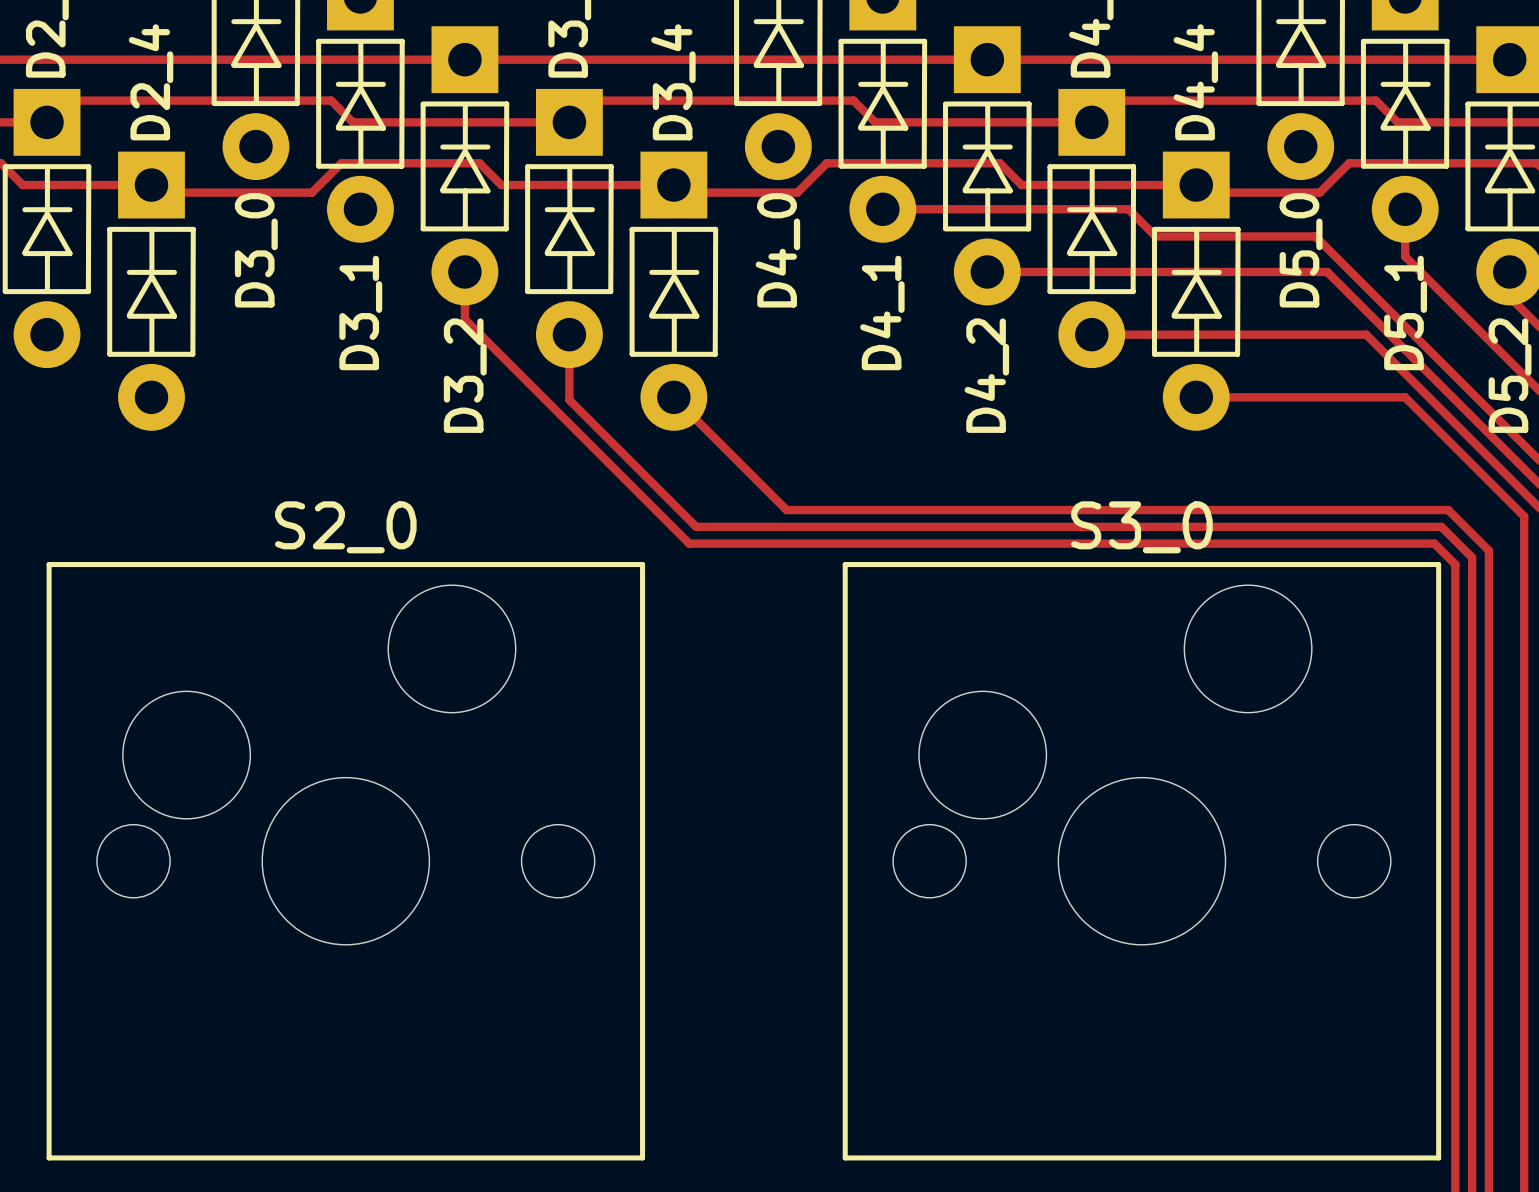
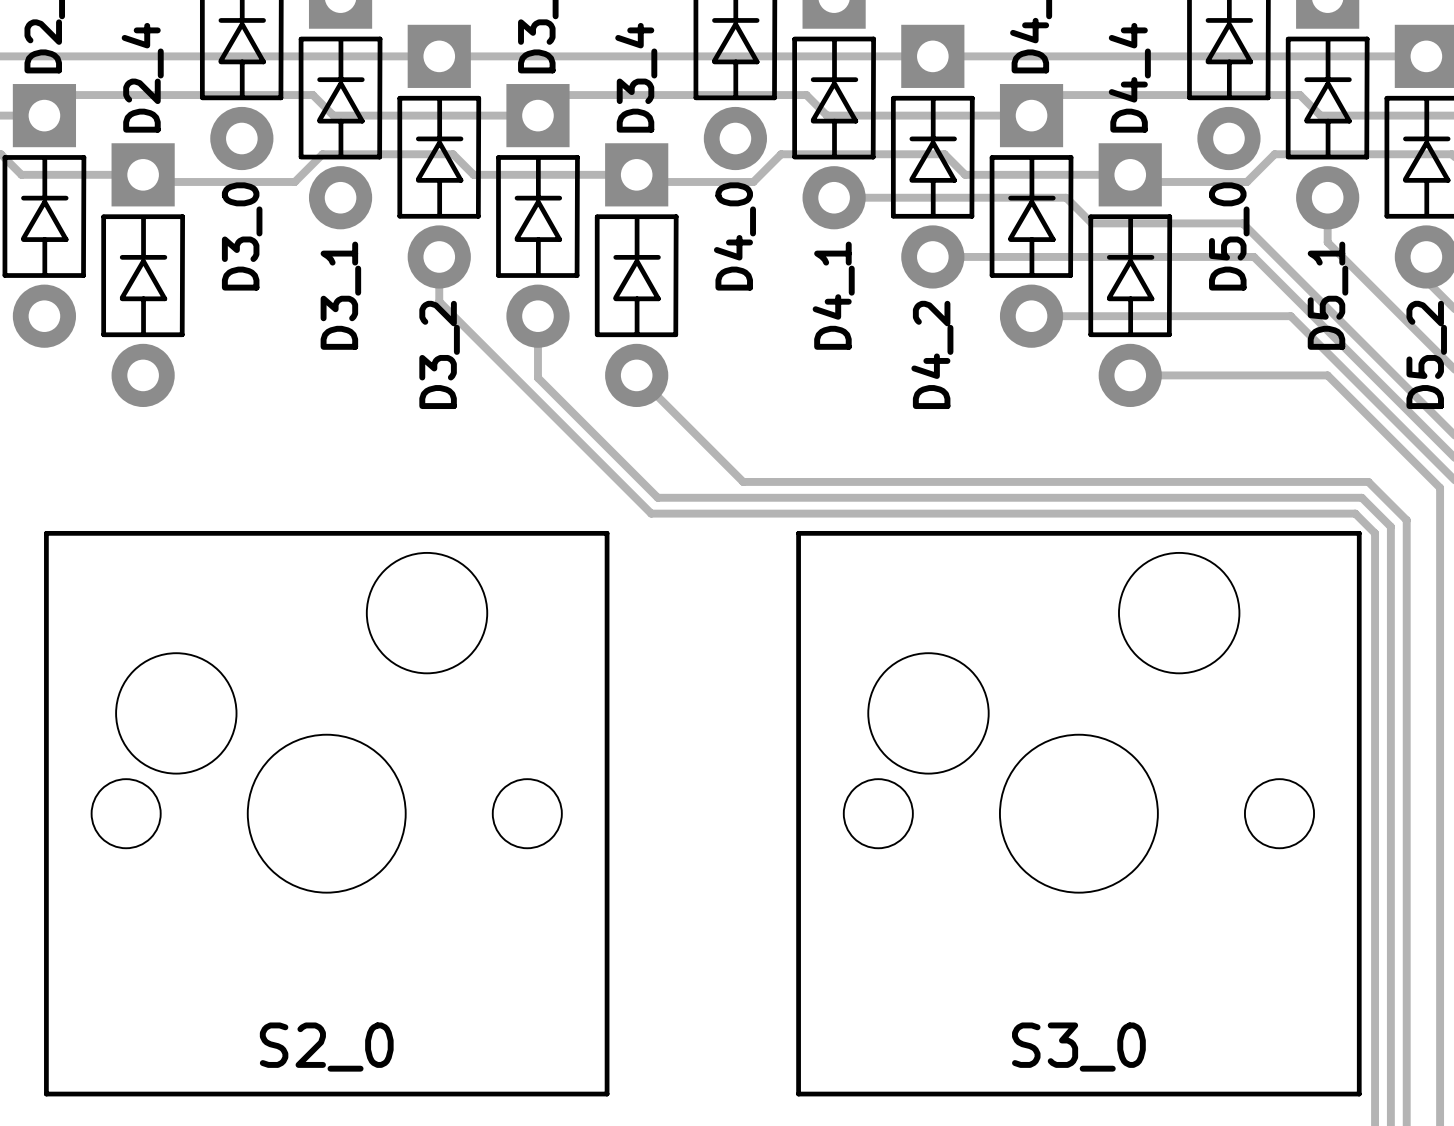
S2_0 name position: S2_0 (345, 527) -> S2_0 (326, 1047)
S3_0 name position: S3_0 (1141, 527) -> S3_0 (1078, 1047)

